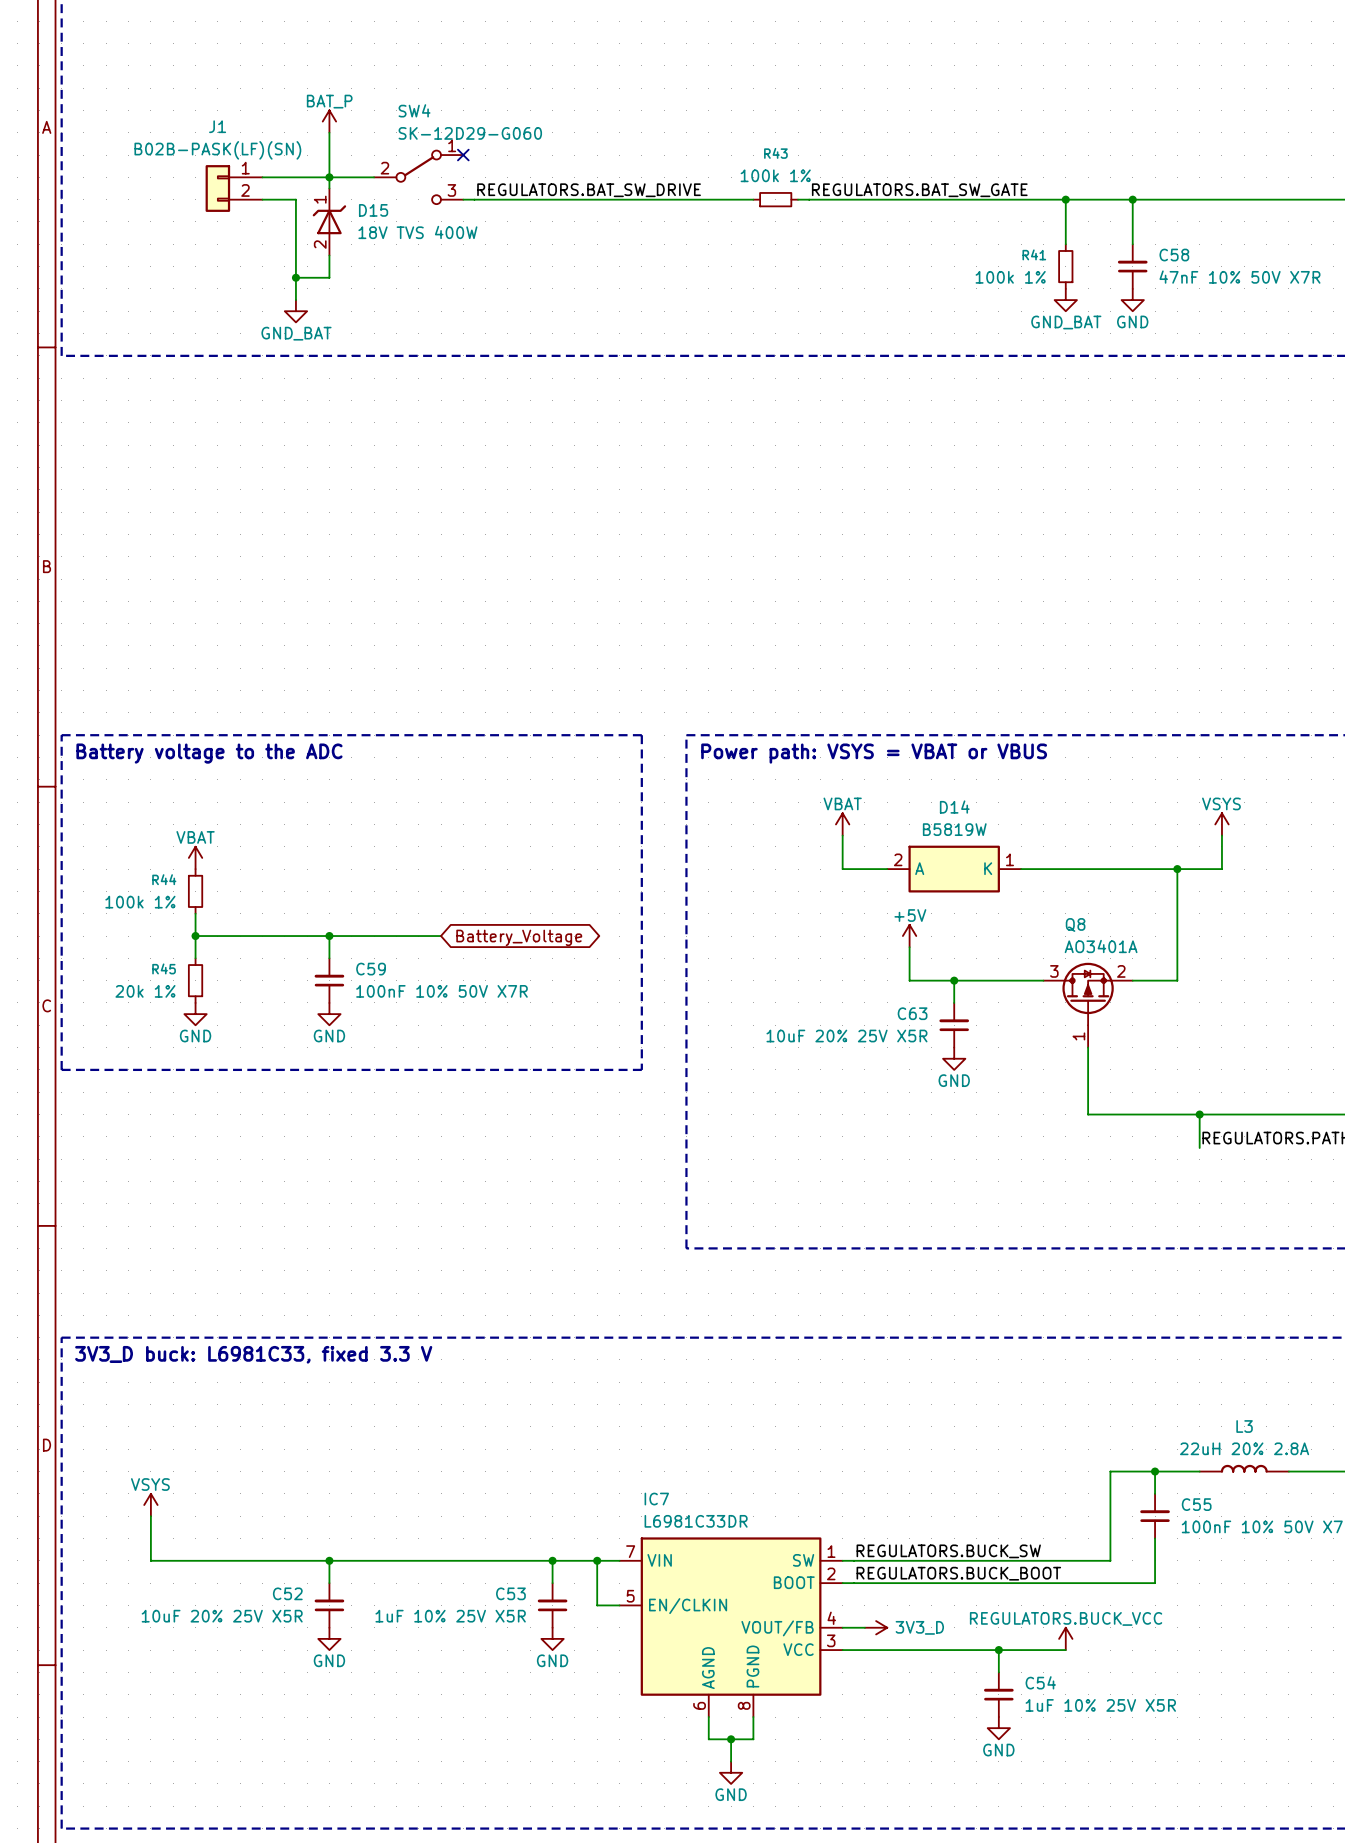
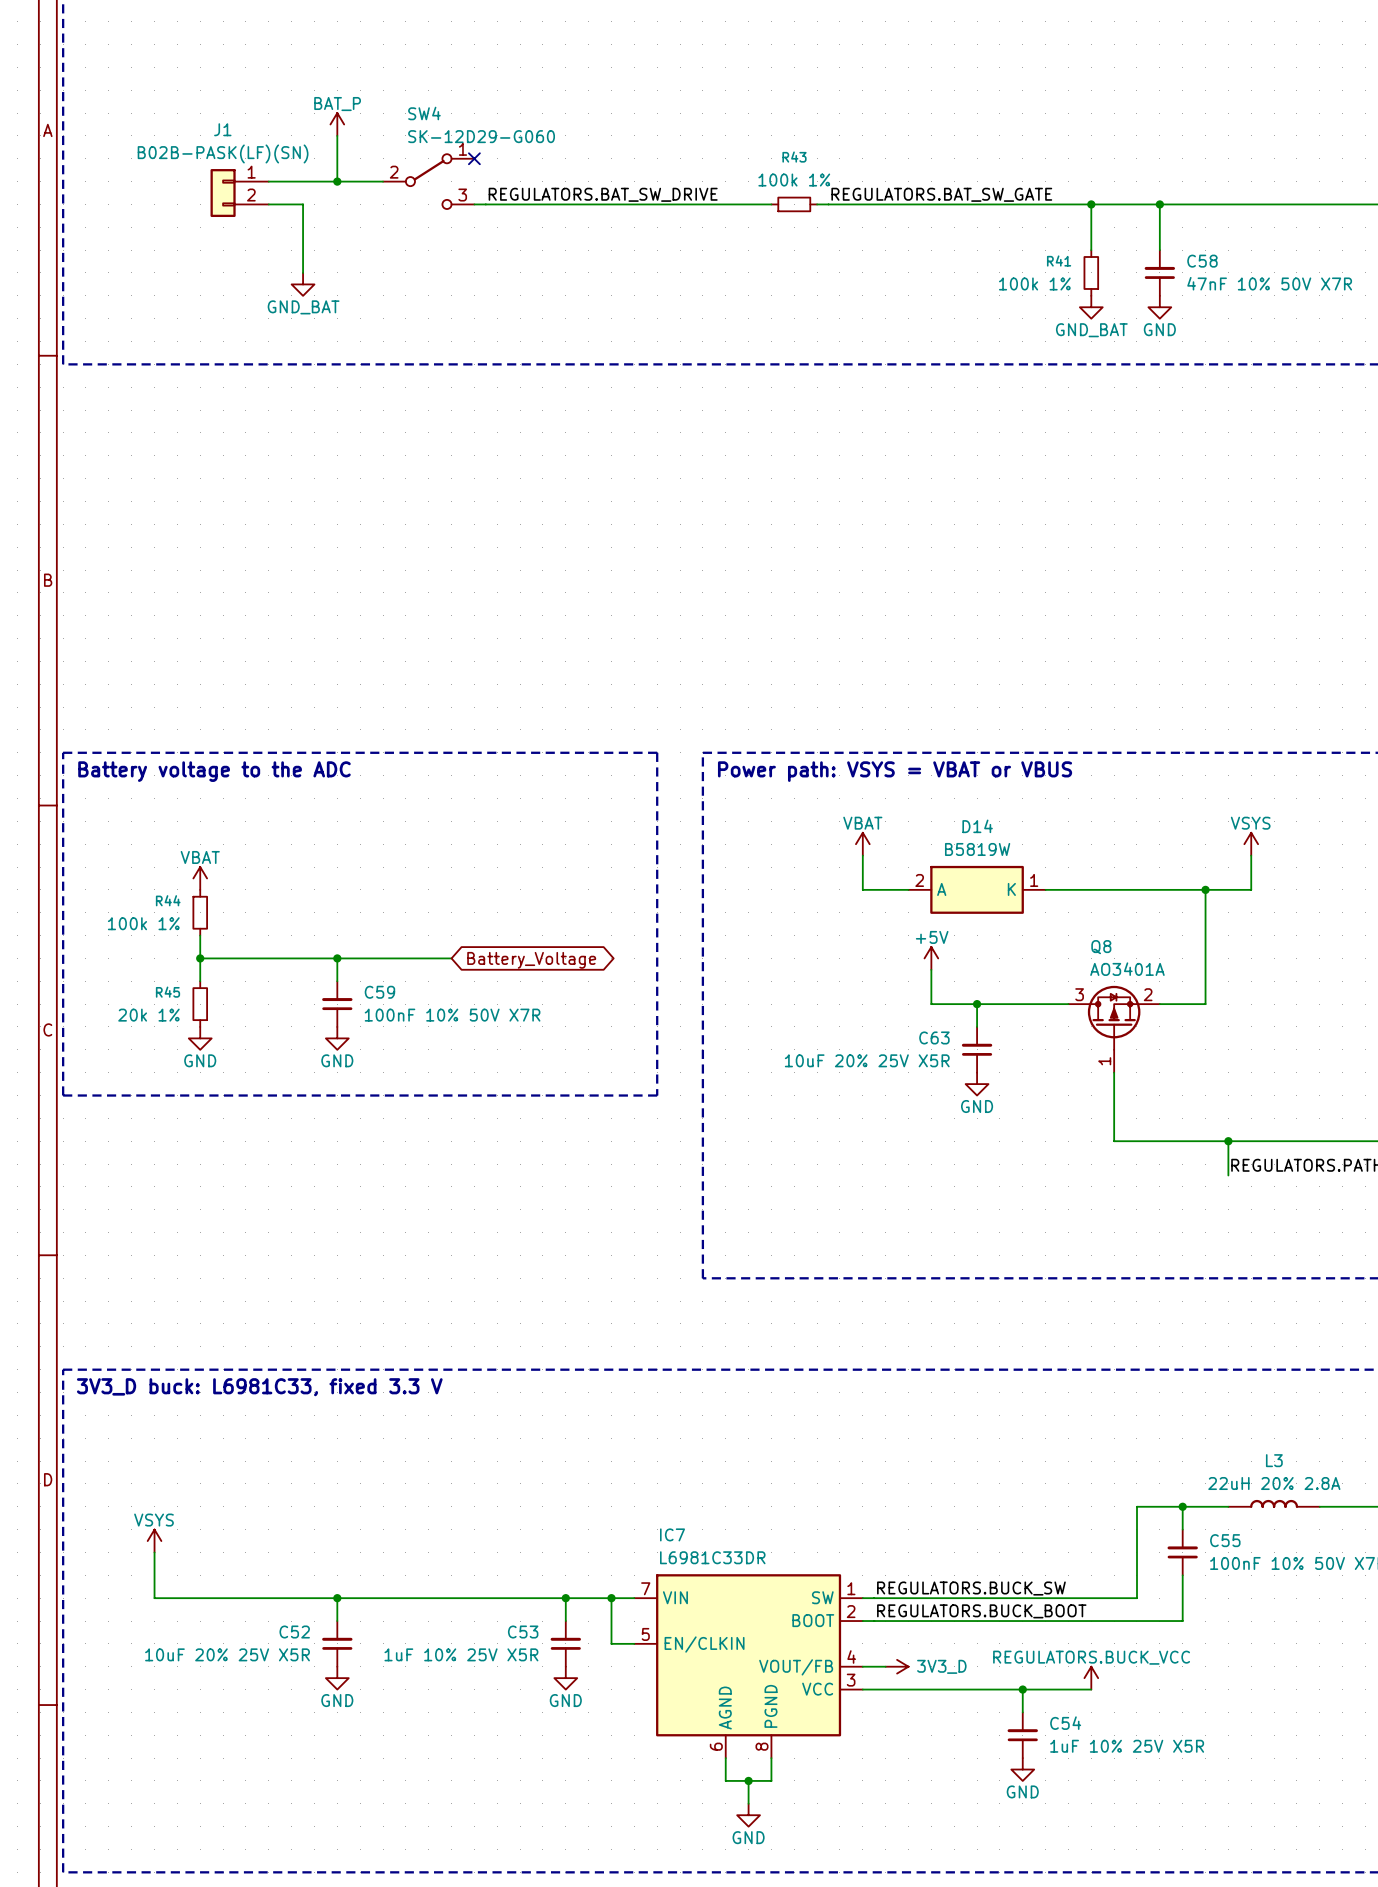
wire: (329, 177) (329, 188) -> none
D15: 18V TVS 400W (329, 221) -> none
wire: (329, 255) (329, 277) (295, 277) -> none
wire: (295, 266) (295, 300) -> none
junction: (295, 277) -> none
power symbol position: GND_BAT (295, 311) -> GND_BAT (303, 284)

